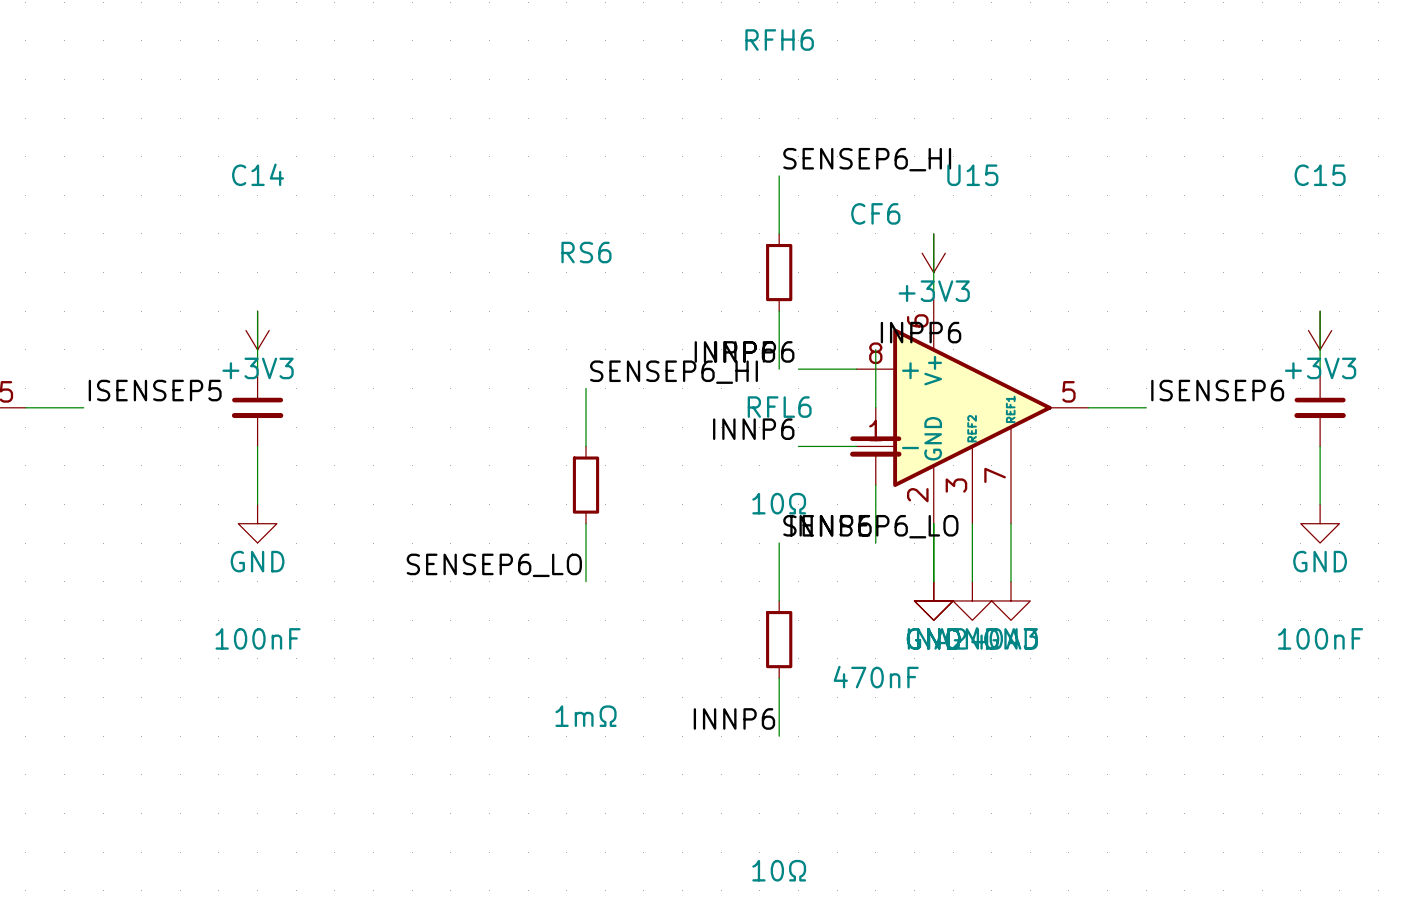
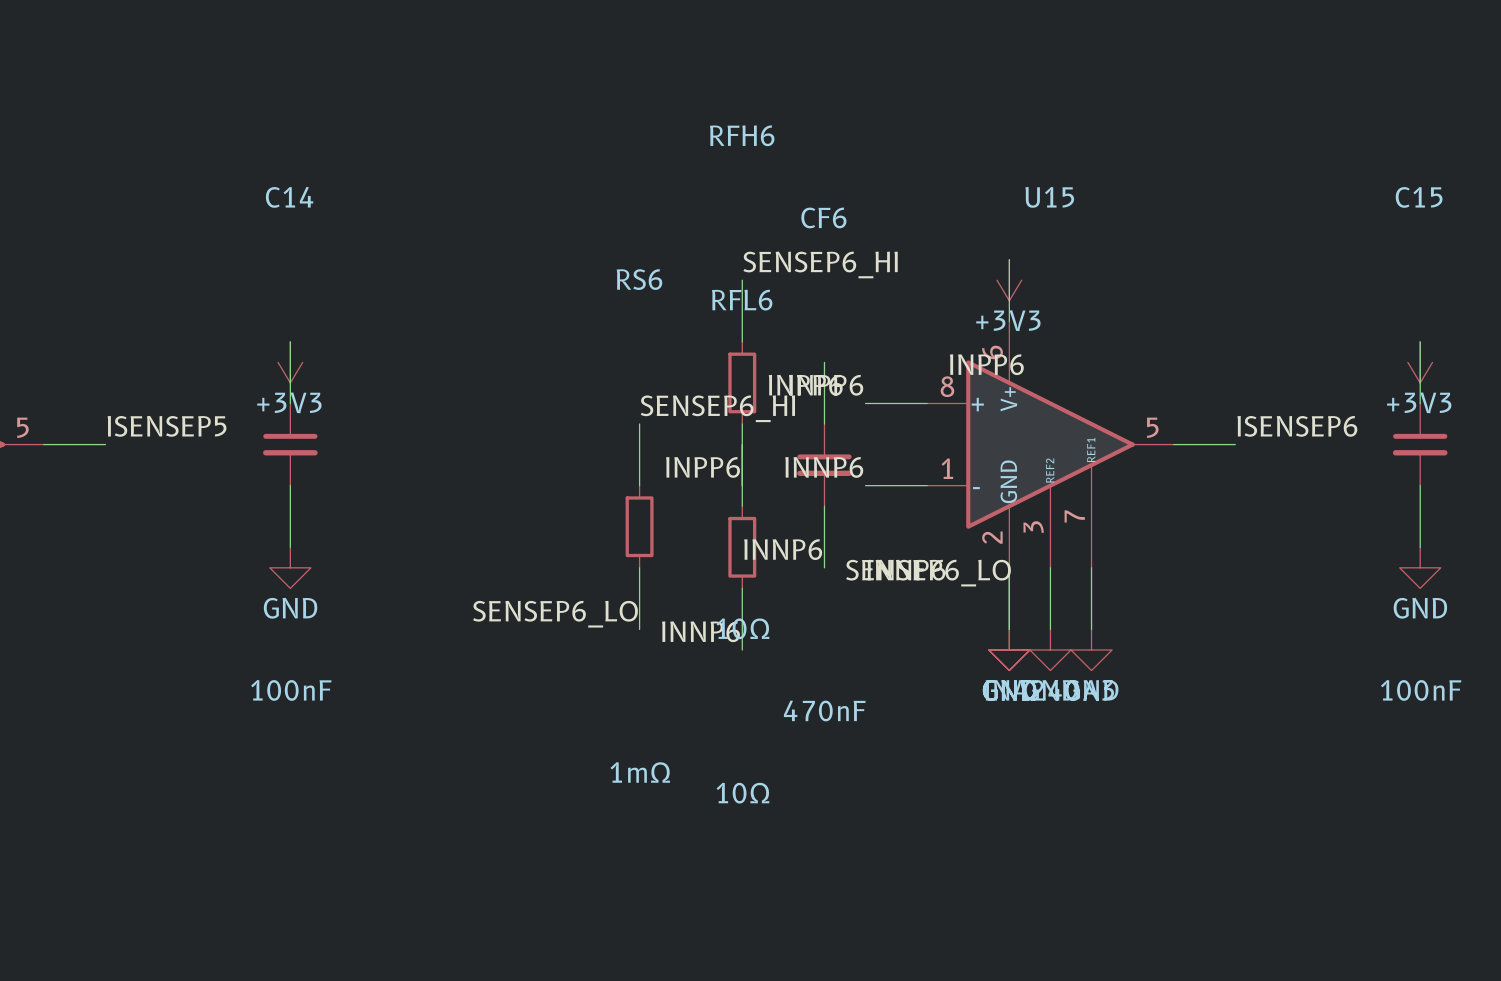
label position: SENSEP6_HI (867, 159) -> SENSEP6_HI (820, 264)
wire: (779, 175) (779, 233) -> none
RFH6 position: (779, 272) -> (742, 382)
wire: (779, 311) (779, 369) -> (742, 280) (742, 341)
wire: (875, 349) (875, 407) -> (824, 362) (824, 424)
wire: none -> (742, 424) (742, 506)
label: none -> INPP6 (703, 467)
CF6 position: (875, 446) -> (824, 465)
wire: (875, 485) (875, 543) -> (824, 506) (824, 567)
label: none -> INNP6 (783, 549)
wire: (779, 543) (779, 600) -> (742, 588) (742, 650)
label: none -> INNP6 (700, 631)
RFL6 position: (779, 639) -> (742, 547)
wire: (779, 678) (779, 736) -> none
label: INNP6 (734, 718) -> none

